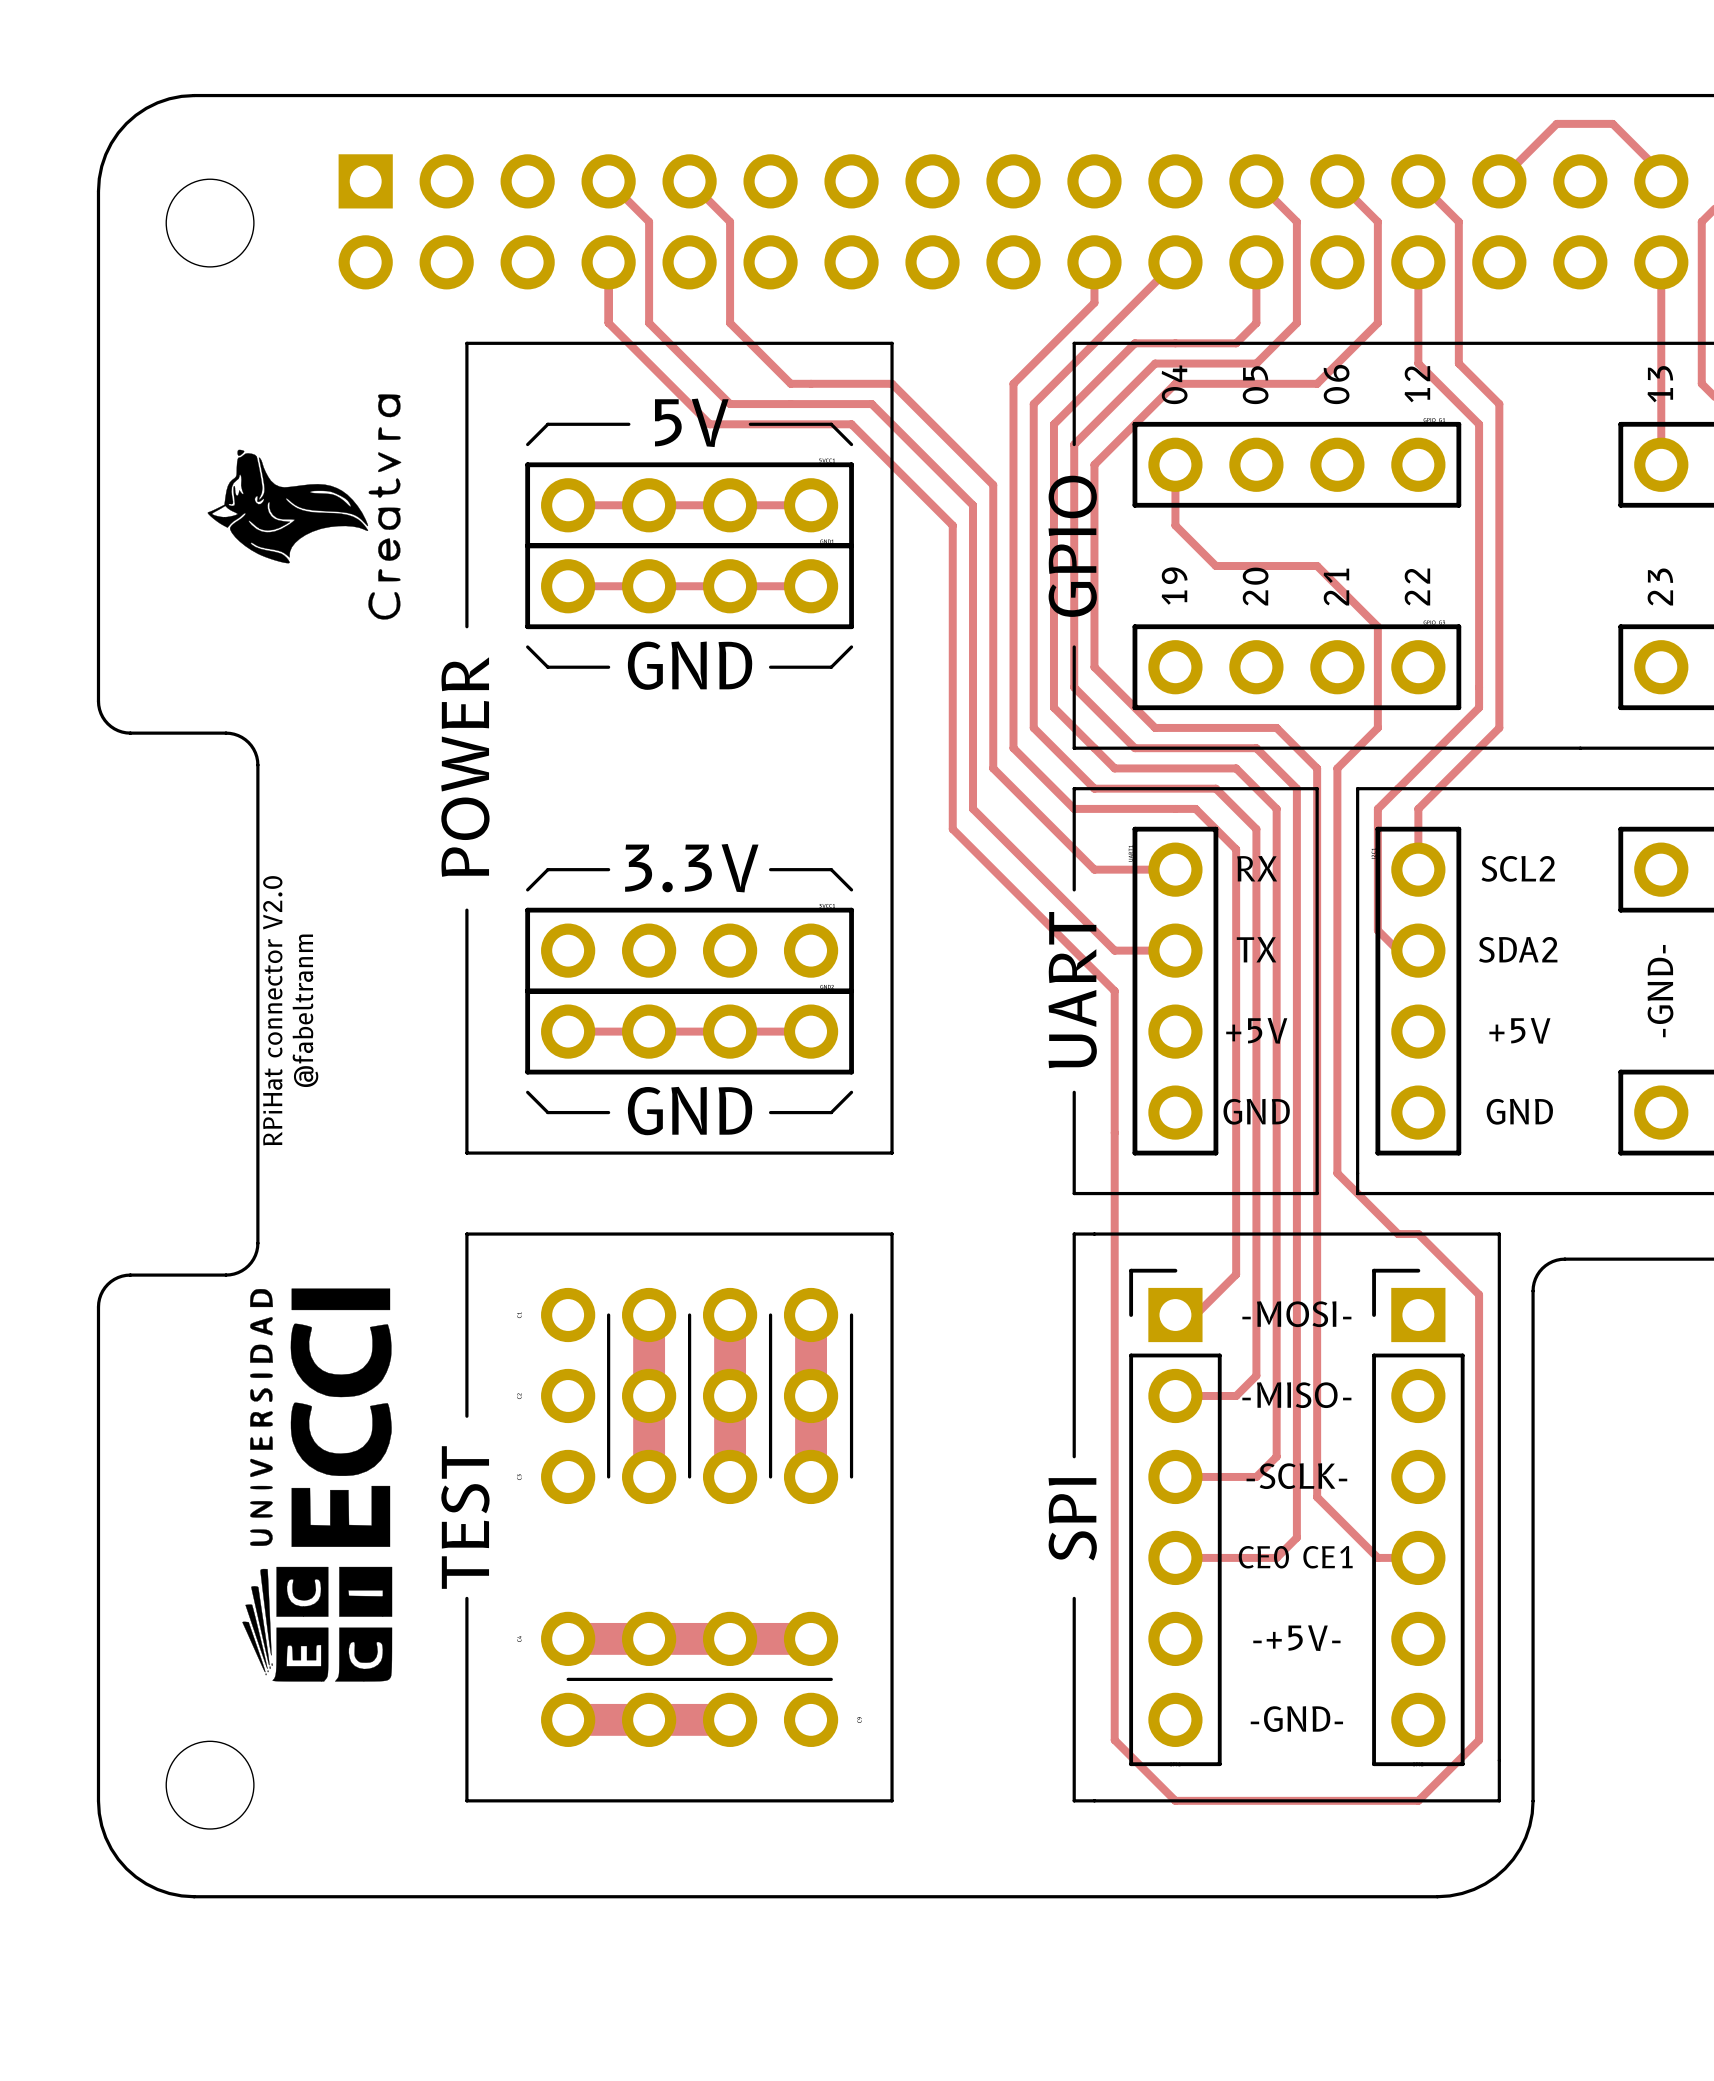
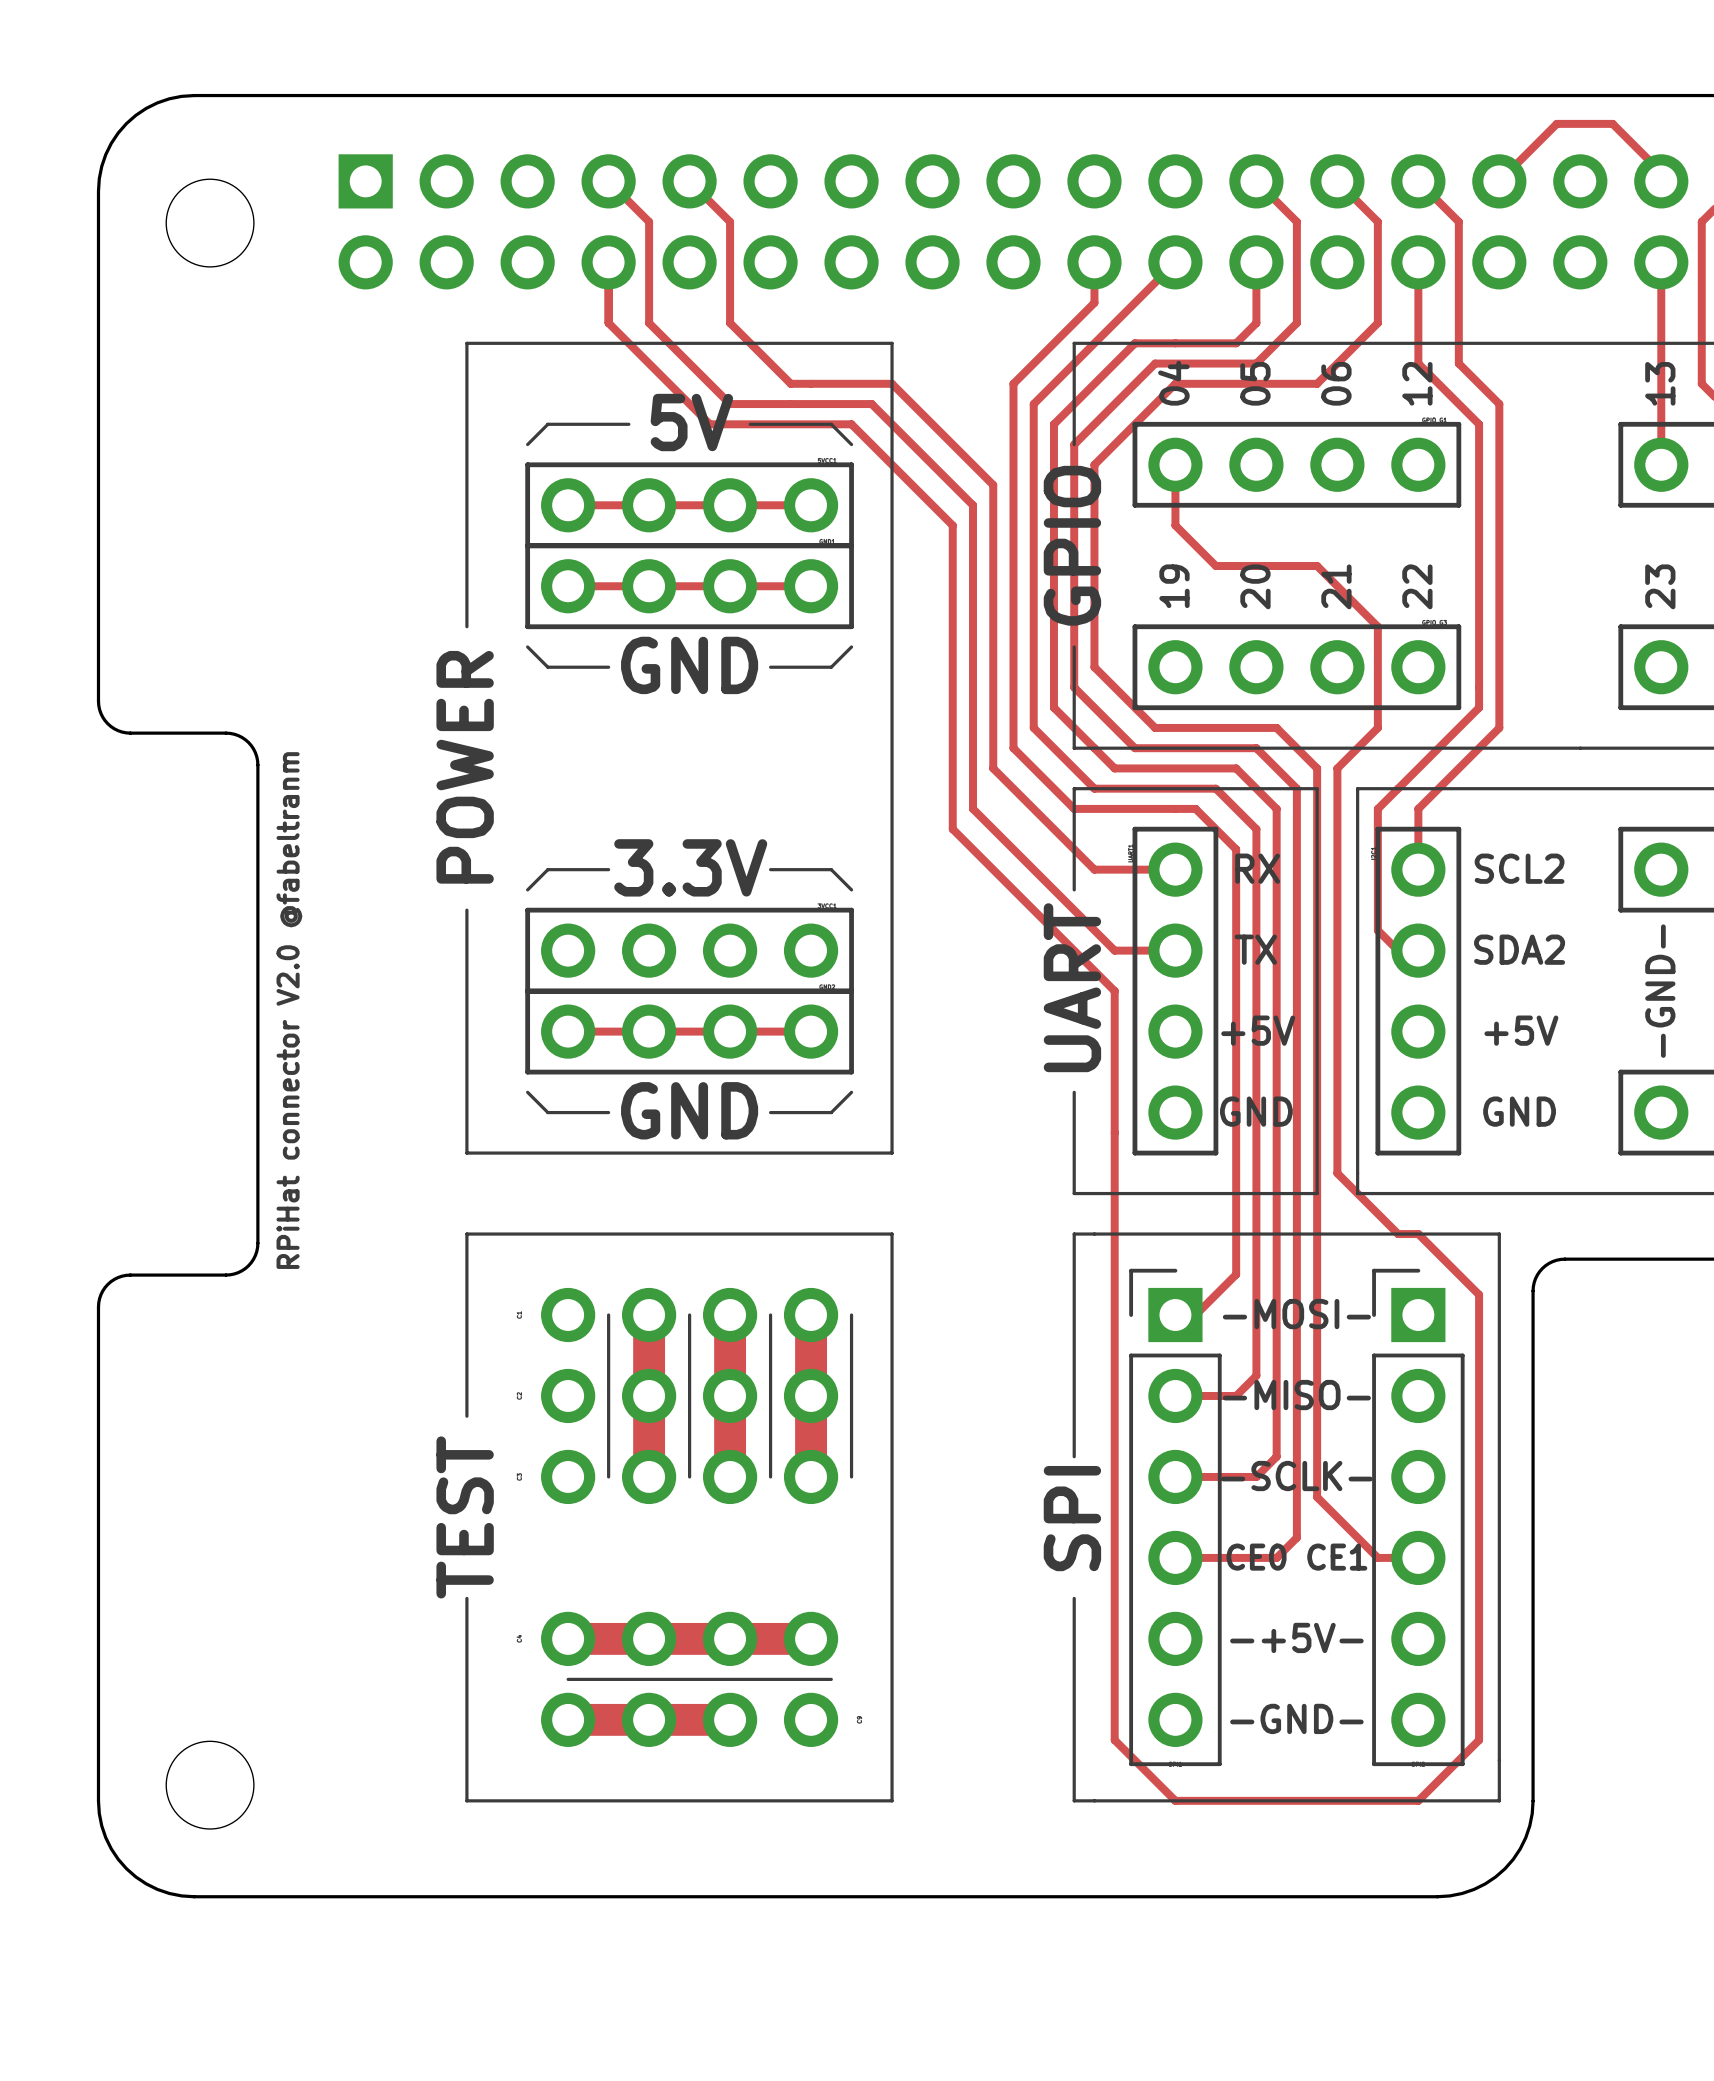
drawing: [207, 394, 402, 620] -> none
text: RPiHat connector V2.0 (272, 1010) -> RPiHat connector V2.0 @fabeltranm (289, 1010)
text: @fabeltranm (305, 1010) -> none
drawing: [242, 1288, 393, 1682] -> none

